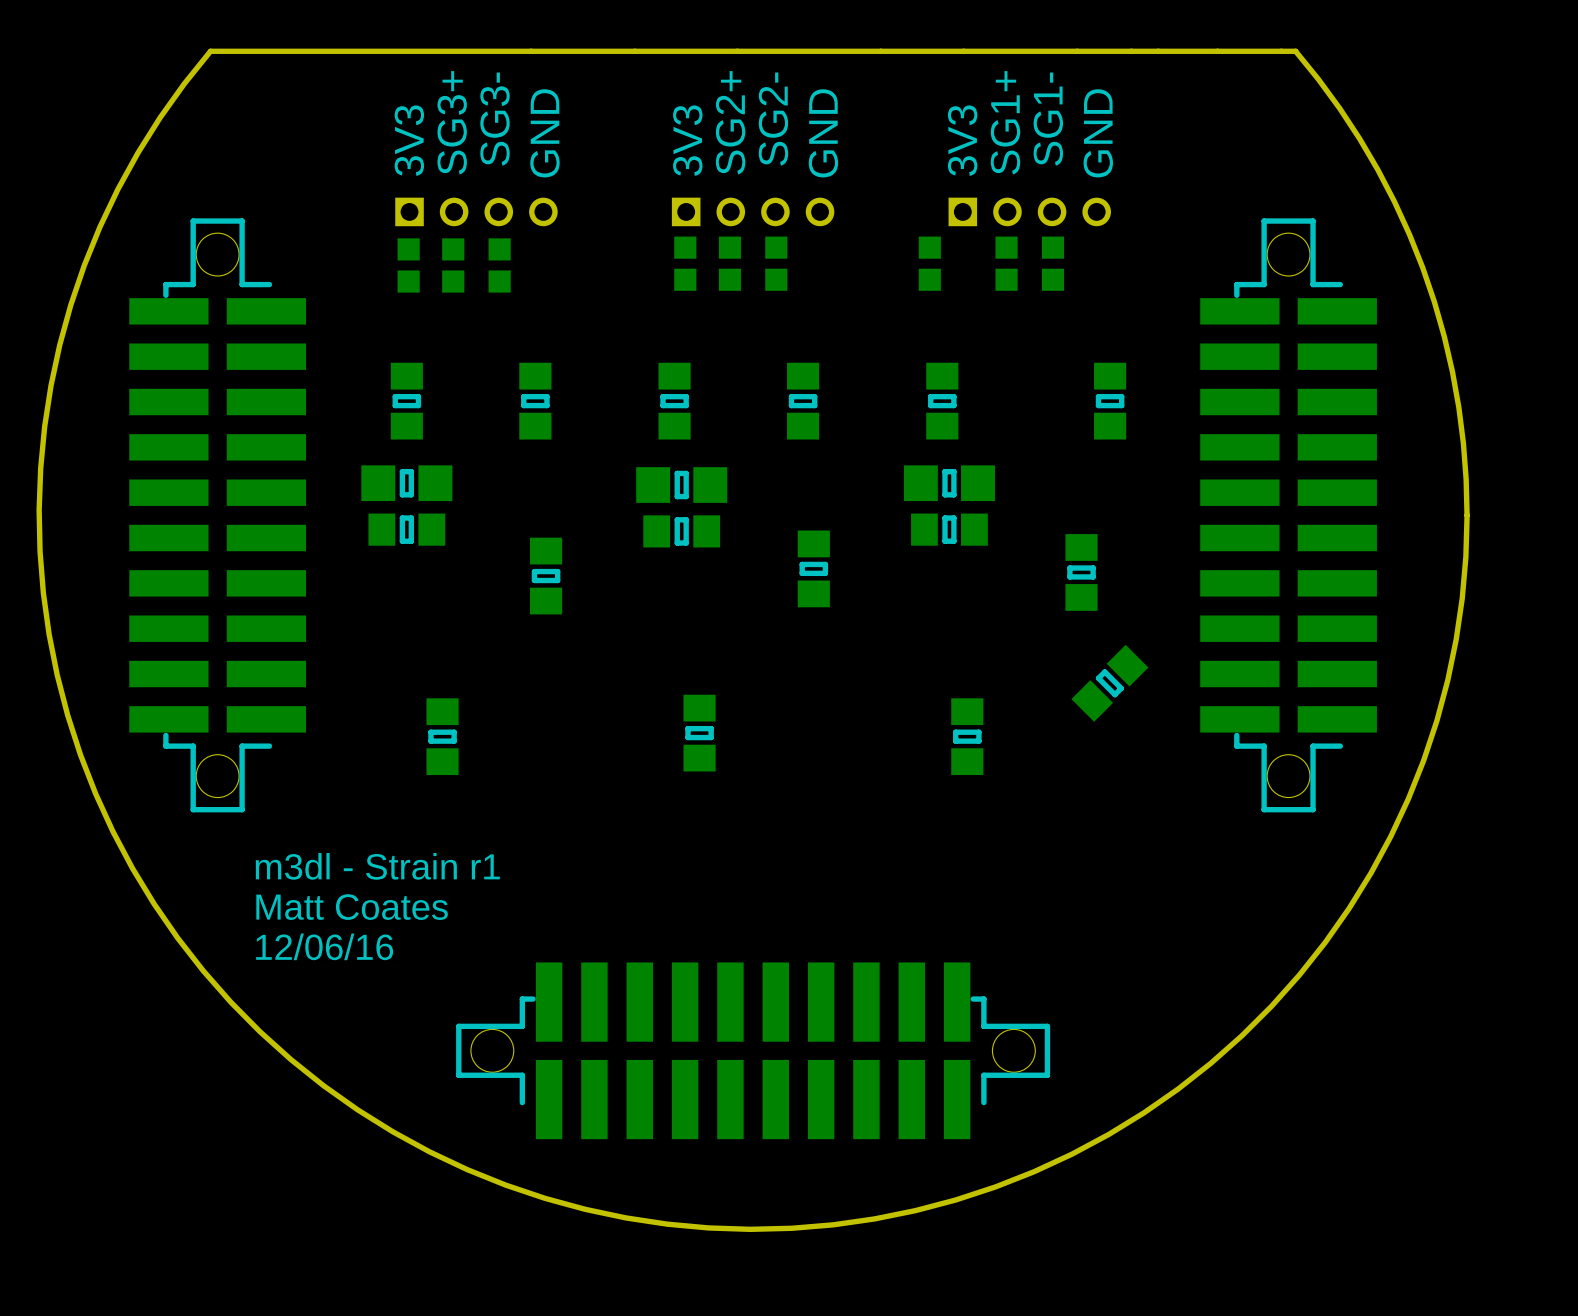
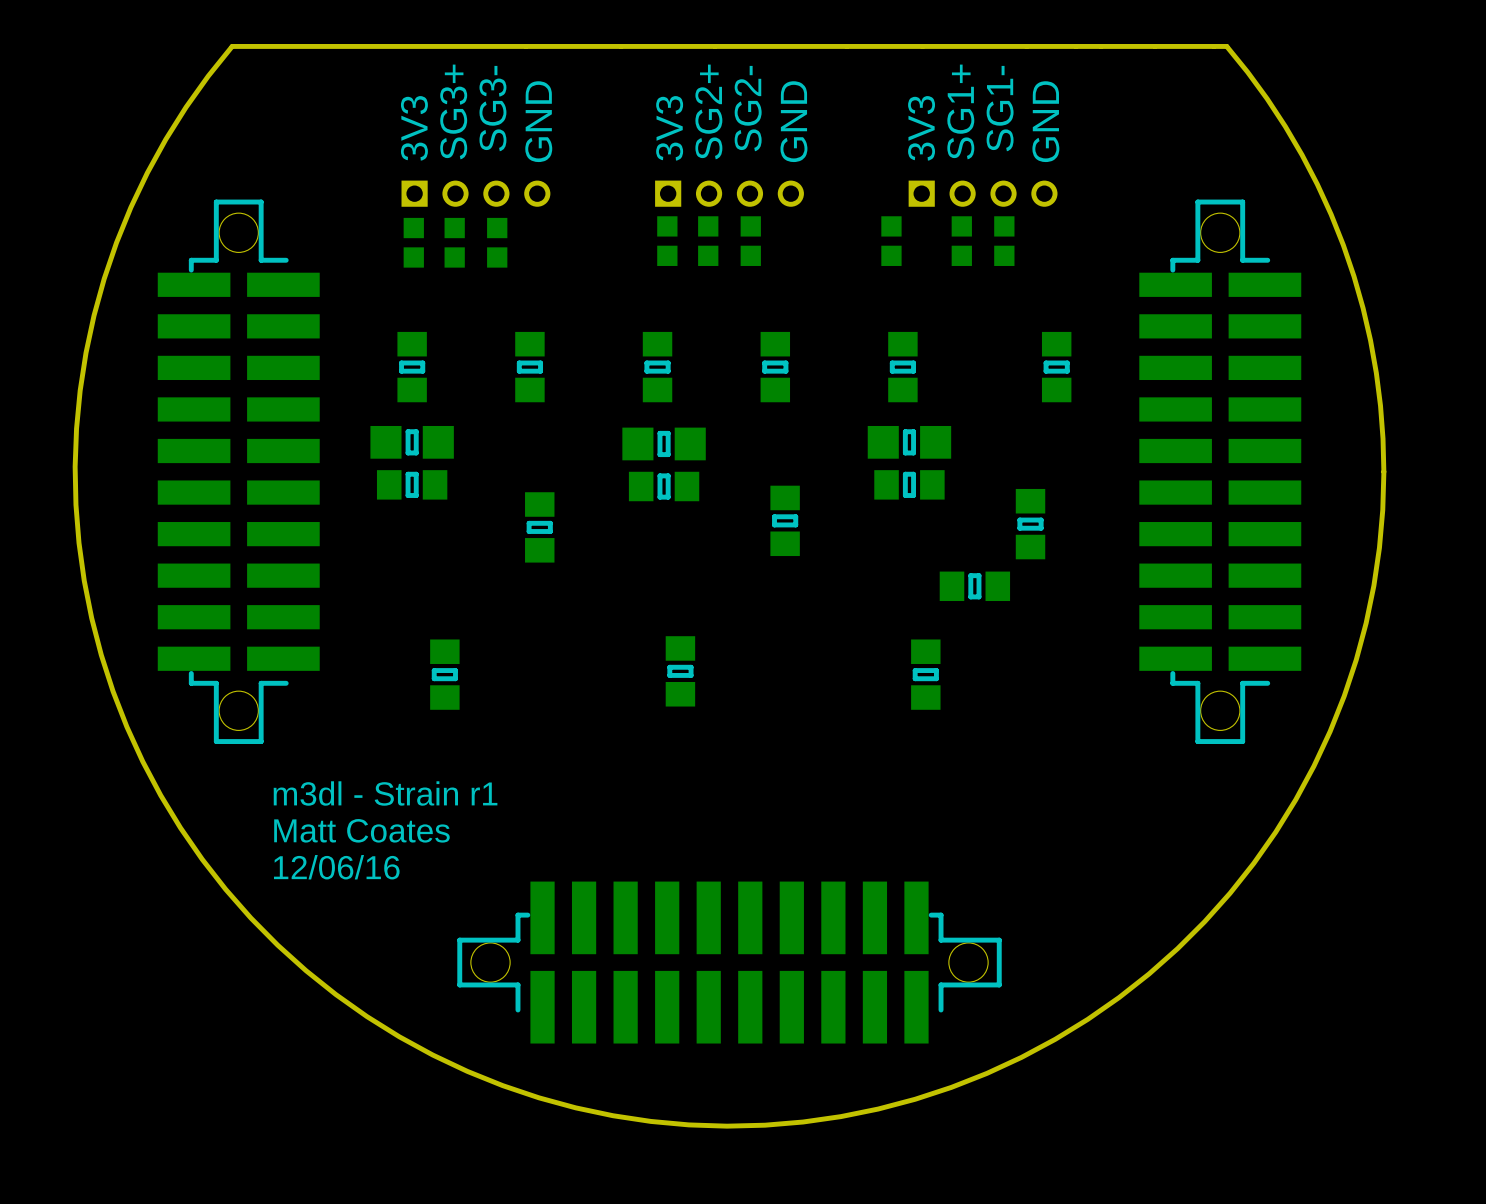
part: none -> (974, 586)
part: (1109, 683) -> none

